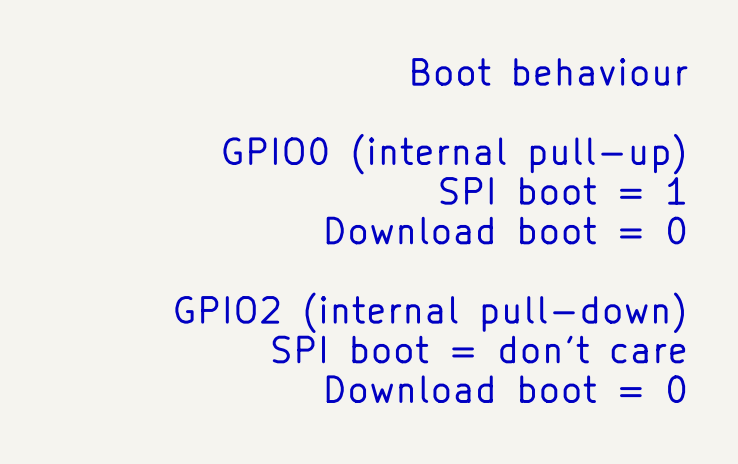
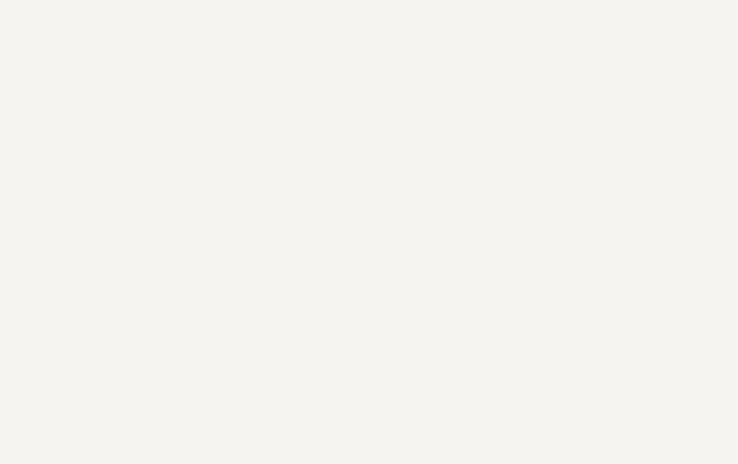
text: Boot behaviour (549, 71) -> none
text: GPIO0 (internal pull-up) (453, 154) -> none
text: SPI boot = 1 (562, 190) -> none
text: Download boot = 0 (505, 230) -> none
text: GPIO2 (internal pull-down) (429, 312) -> none
text: SPI boot = don't care (478, 349) -> none
text: Download boot = 0 (505, 389) -> none

